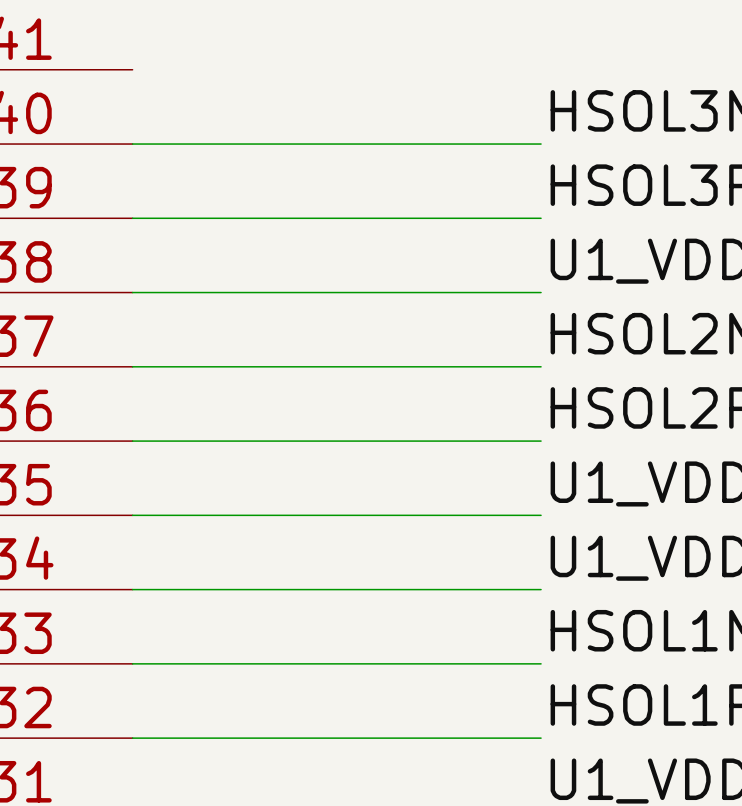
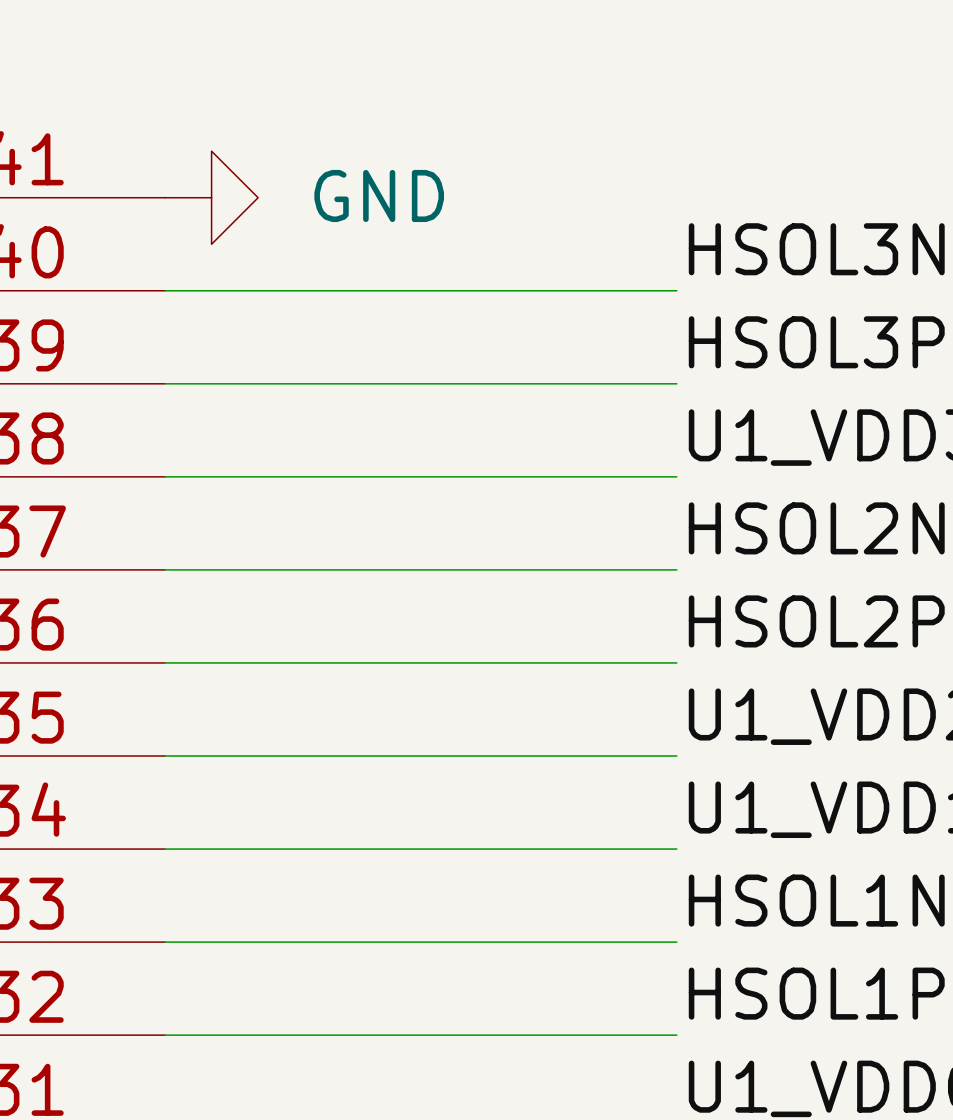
power symbol: none -> GND (211, 197)

